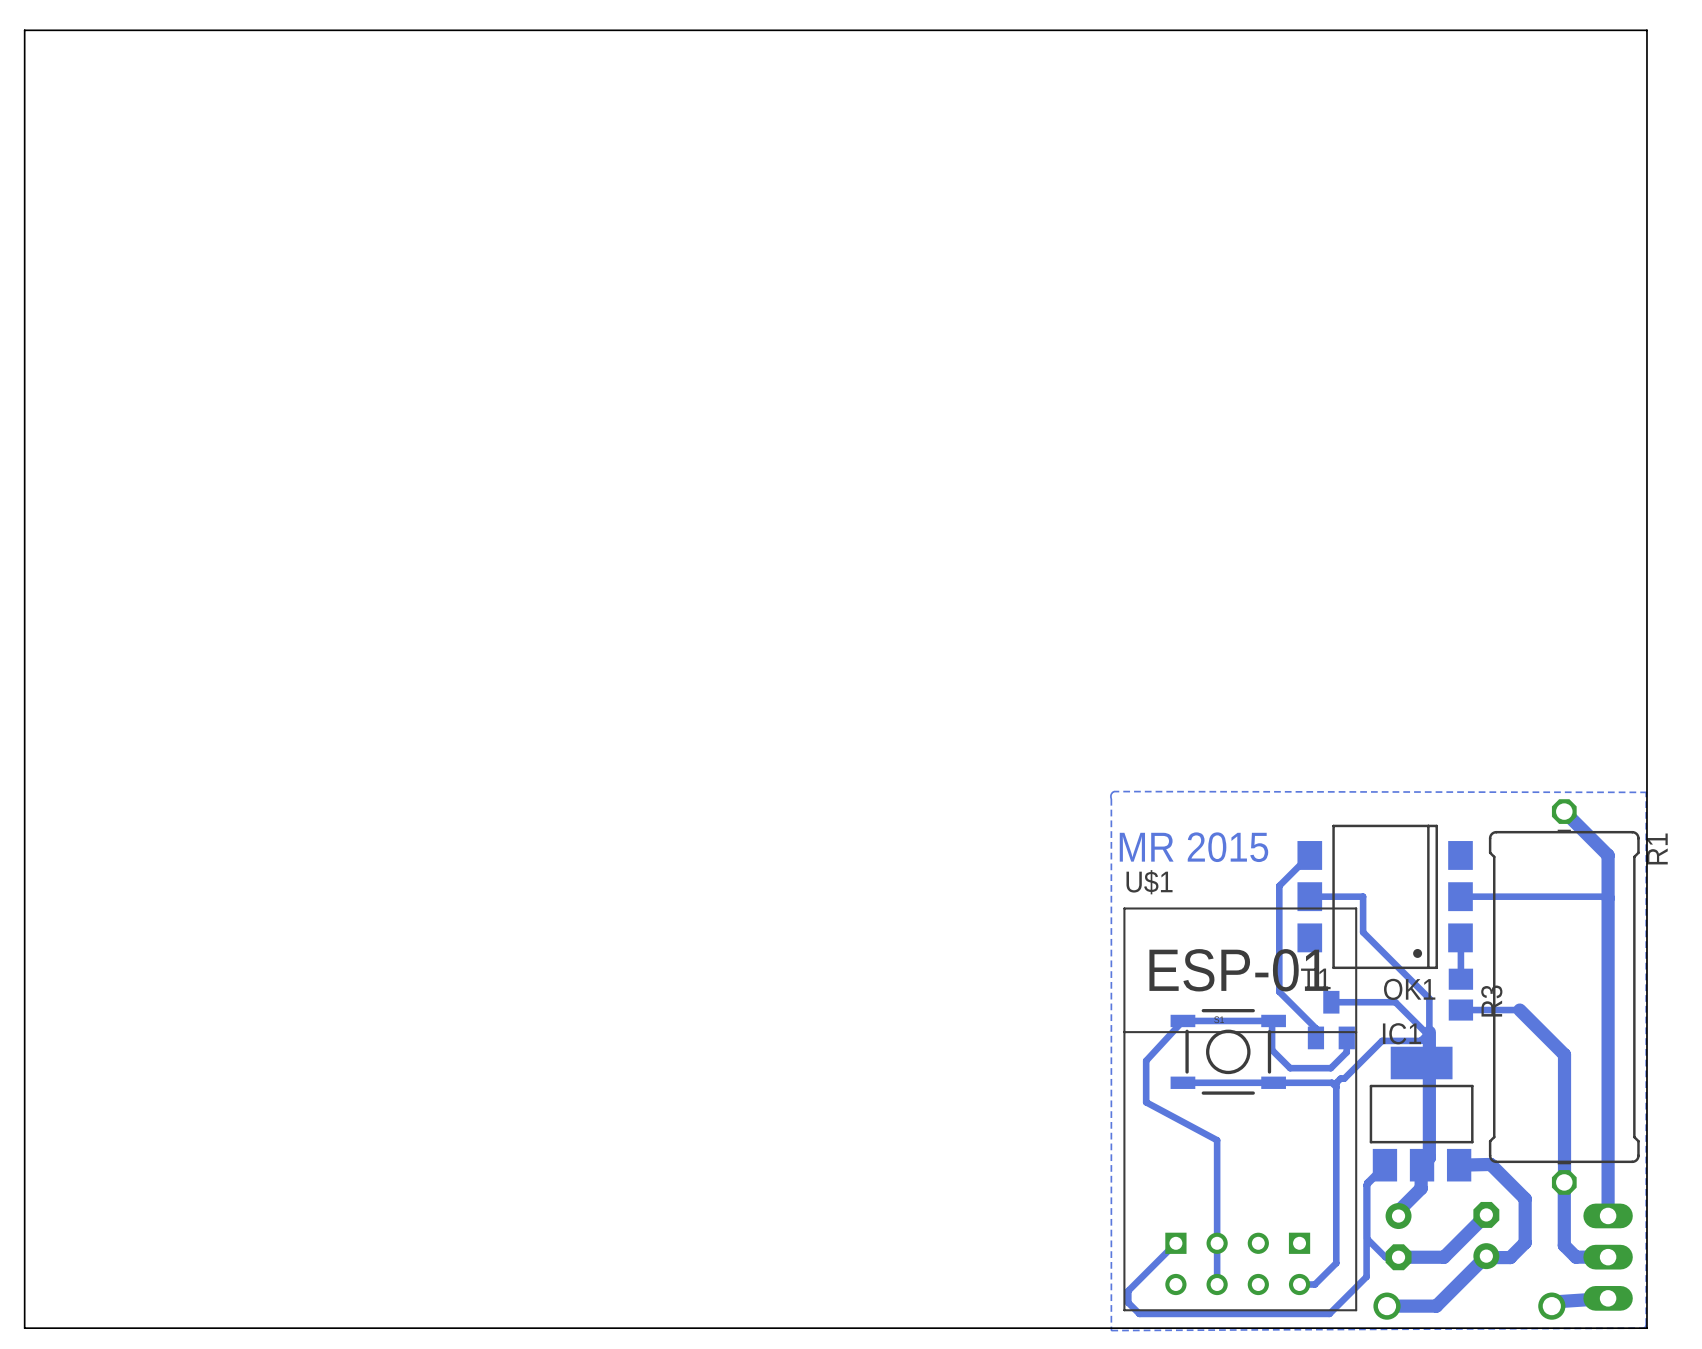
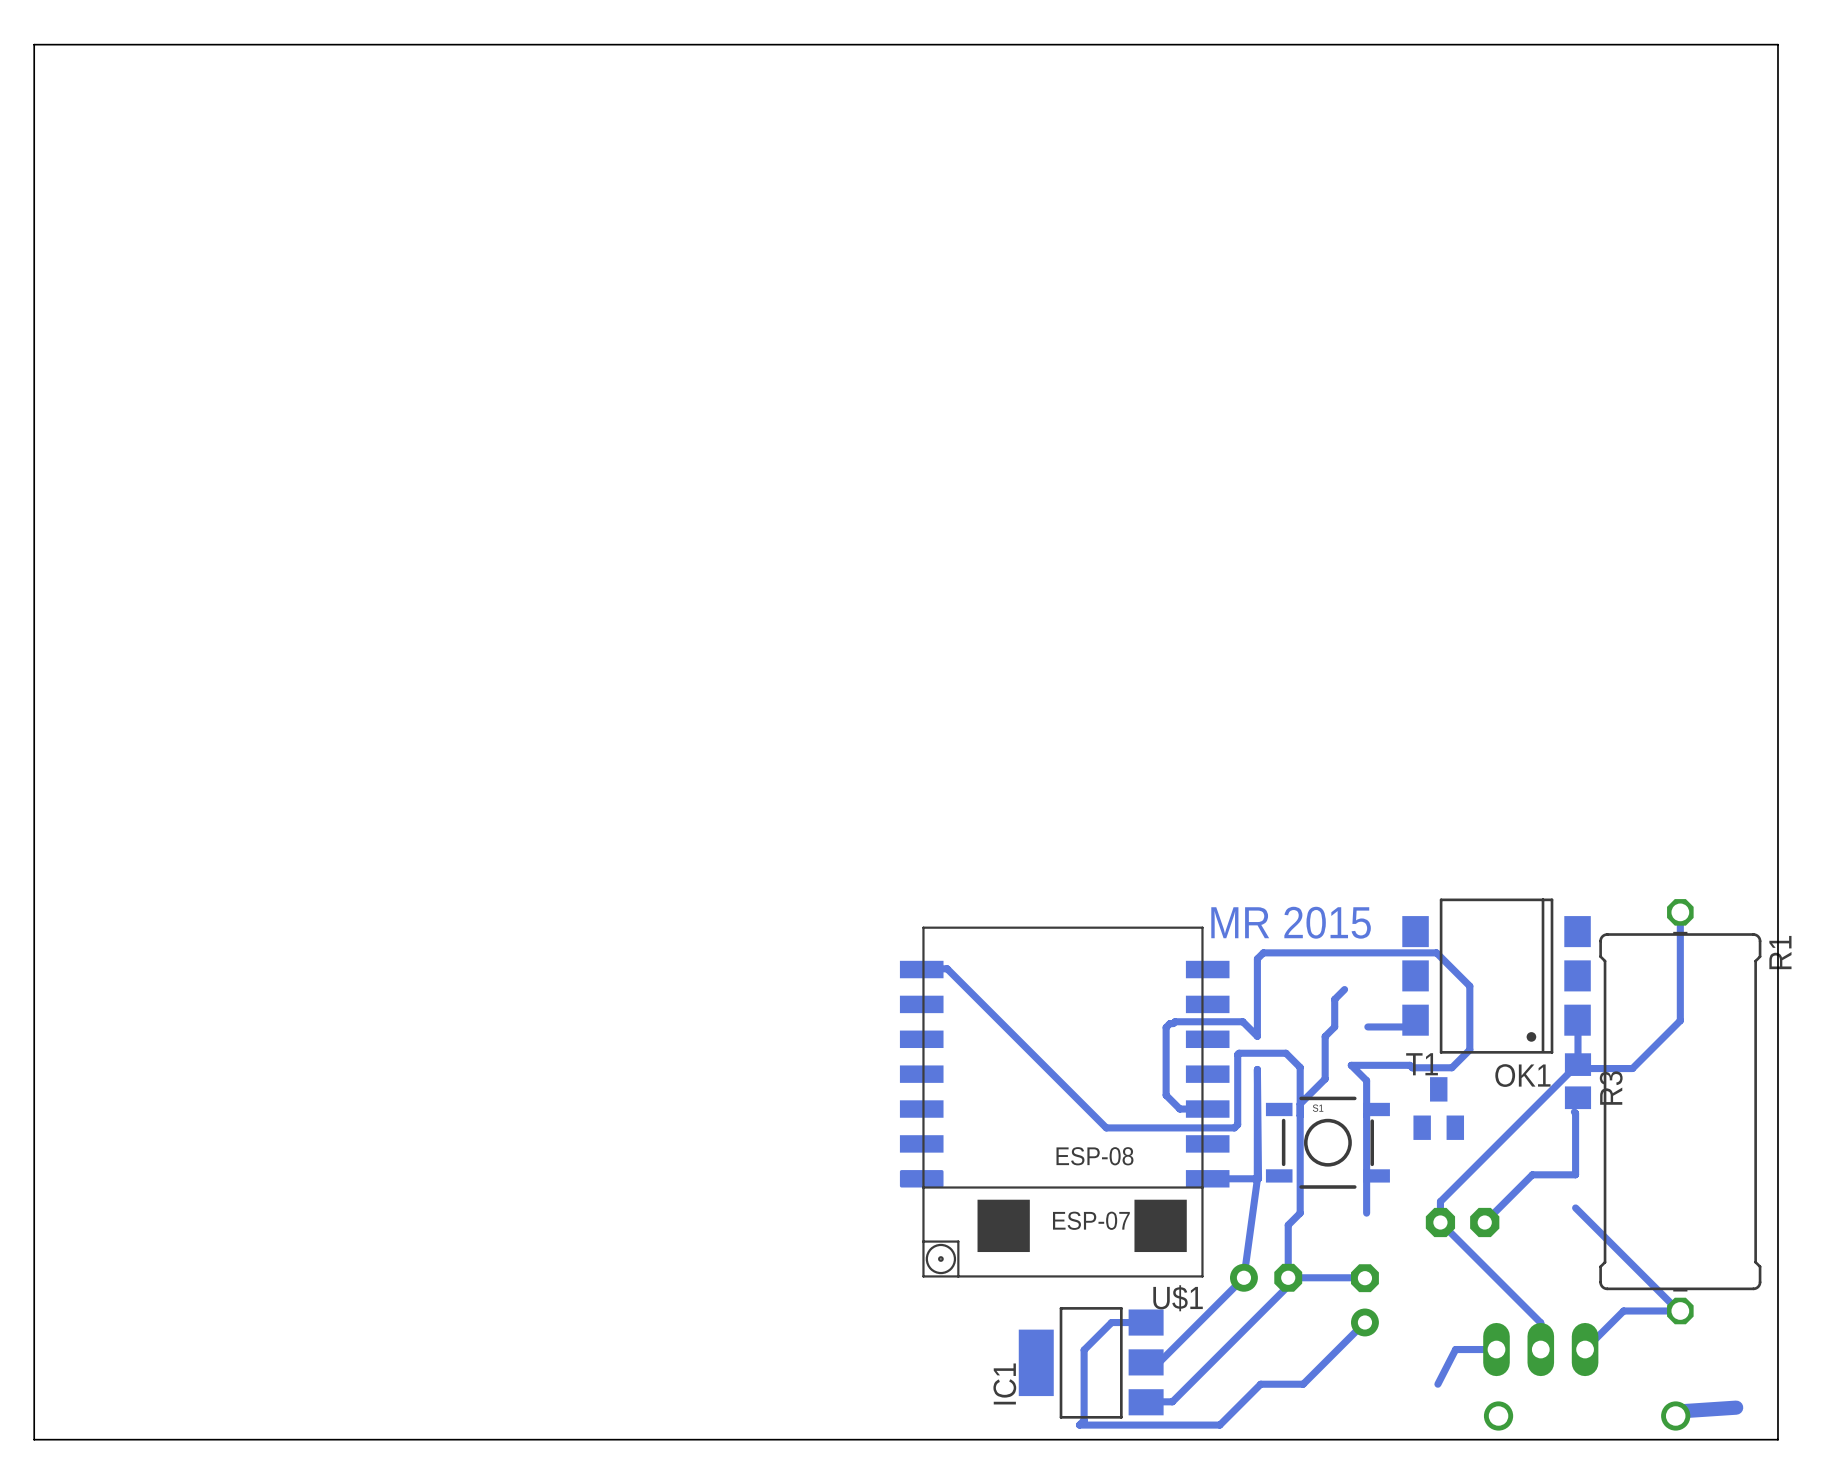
bottom zone outline: (1113, 791) (1646, 792) (1645, 1327) (1111, 1330) (1110, 796) (1113, 791) -> none
bottom track: (1564, 811) (1608, 855) (1608, 1215) -> none
bottom track: none -> (1680, 912) (1680, 1020) (1632, 1068) (1574, 1067) (1440, 1201) (1440, 1222) (1540, 1322) (1540, 1349)
bottom track: (1309, 855) (1279, 885) (1279, 991) (1315, 1028) (1315, 1037) -> none
U$1 name position: U$1 (1149, 882) -> U$1 (1178, 1298)
bottom track: none -> (921, 969) (947, 968) (1106, 1127) (1234, 1127) (1237, 1124) (1239, 1053) (1285, 1053) (1300, 1067) (1300, 1213) (1288, 1225) (1288, 1286) (1172, 1401) (1146, 1402)
bottom track: (1309, 896) (1363, 896) (1363, 932) (1429, 998) (1429, 1032) -> none
bottom track: (1460, 896) (1608, 898) -> none
U$1 footprint: [1123, 907, 1358, 1312] -> [899, 926, 1230, 1278]
bottom track: none -> (1344, 989) (1334, 999) (1334, 1026) (1325, 1036) (1325, 1078) (1300, 1103)
bottom track: none -> (1412, 1023) (1408, 1026) (1367, 1026)
R1 position: (1564, 997) -> (1680, 1111)
bottom track: (1331, 1002) (1395, 1002) (1427, 1034) -> none
bottom track: (1460, 1010) (1519, 1010) (1564, 1054) (1564, 1190) -> none
bottom track: none -> (1207, 1109) (1179, 1109) (1166, 1095) (1166, 1027) (1175, 1021) (1242, 1021) (1257, 1036) (1257, 958) (1263, 952) (1436, 952) (1469, 986) (1469, 1049) (1451, 1067) (1351, 1065) (1366, 1080) (1366, 1213)
bottom track: none -> (1574, 1112) (1575, 1174) (1532, 1174) (1484, 1222)
bottom track: (1429, 1032) (1420, 1040) (1382, 1040) (1344, 1078) (1340, 1078) (1336, 1082) (1336, 1263) (1314, 1284) (1299, 1284) -> none
bottom track: (1429, 1032) (1429, 1157) (1421, 1166) (1421, 1188) (1398, 1211) (1398, 1216) -> none
bottom track: (1346, 1037) (1346, 1052) (1330, 1068) (1290, 1068) (1272, 1050) (1273, 1020) (1182, 1020) (1146, 1060) (1146, 1102) (1217, 1140) (1217, 1284) -> none
bottom track: (1182, 1082) (1332, 1082) (1336, 1087) -> none
bottom track: none -> (1207, 1178) (1258, 1178) (1257, 1069) (1257, 1179) (1243, 1277) (1159, 1362) (1146, 1362)
bottom track: none -> (1575, 1207) (1678, 1310)
IC1 rotation: 0° (1421, 1114) -> 90° counterclockwise (1091, 1362)
IC1 position: (1421, 1114) -> (1091, 1362)
part: none -> (1462, 1222)
bottom track: (1459, 1165) (1490, 1164) (1525, 1198) (1525, 1242) (1510, 1257) (1486, 1256) (1436, 1306) (1387, 1306) -> none
part: none -> (1266, 1277)
bottom track: none -> (1288, 1277) (1364, 1278)
bottom track: (1564, 1182) (1564, 1245) (1575, 1257) (1608, 1257) -> none
part: none -> (1364, 1300)
bottom track: none -> (1680, 1310) (1623, 1310) (1585, 1349)
bottom track: (1486, 1214) (1444, 1257) (1385, 1257) (1367, 1239) (1367, 1182) (1384, 1165) (1384, 1166) (1366, 1185) (1366, 1276) (1329, 1313) (1139, 1313) (1128, 1302) (1128, 1290) (1175, 1243) -> none
bottom track: none -> (1364, 1322) (1303, 1384) (1260, 1384) (1219, 1425) (1079, 1425) (1084, 1420) (1084, 1350) (1111, 1322) (1146, 1322)
part: (1486, 1235) -> none
part: (1398, 1236) -> none
bottom track: none -> (1496, 1349) (1455, 1349) (1437, 1384)
part rotation: 0° (1608, 1257) -> 90° clockwise (1540, 1349)
part position: (1608, 1257) -> (1540, 1349)

